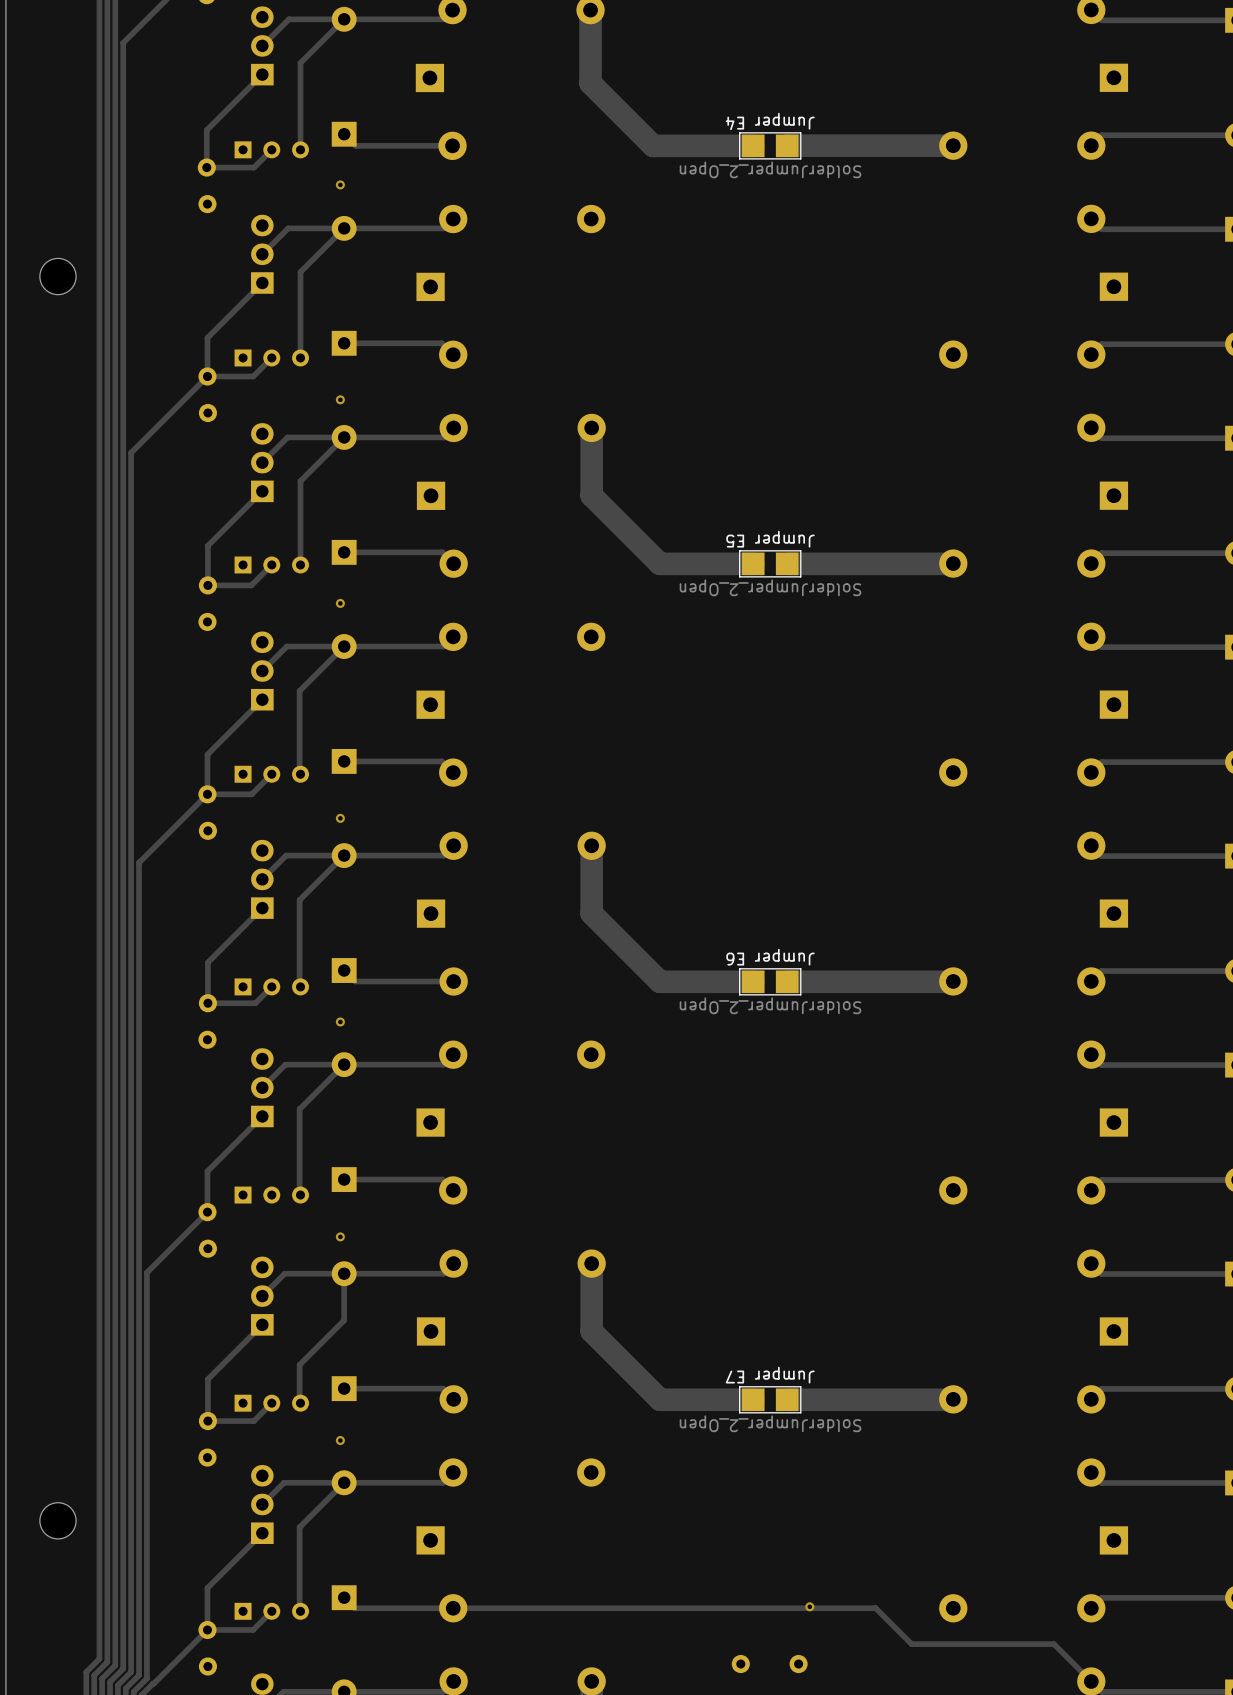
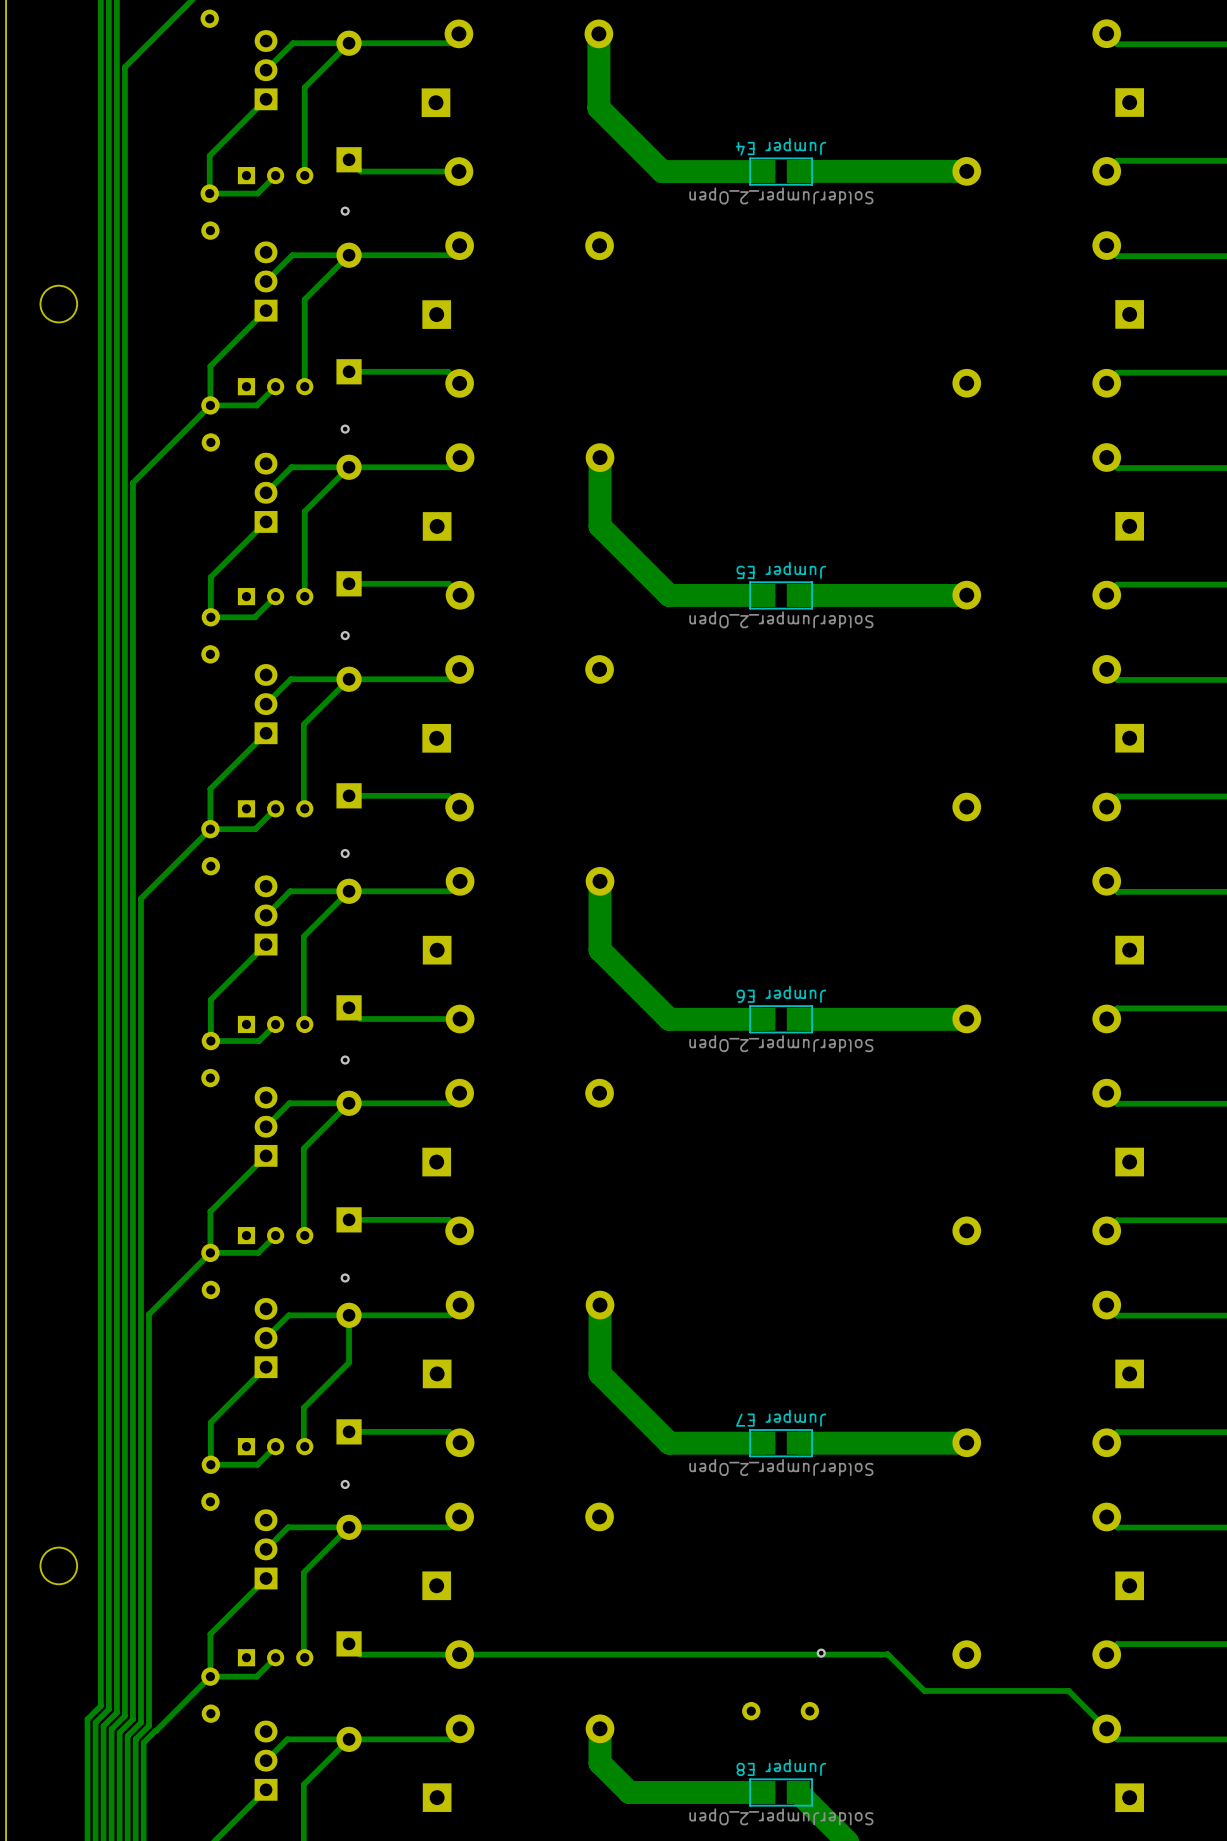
track: none -> (275, 1235) (258, 1252) (210, 1252)

